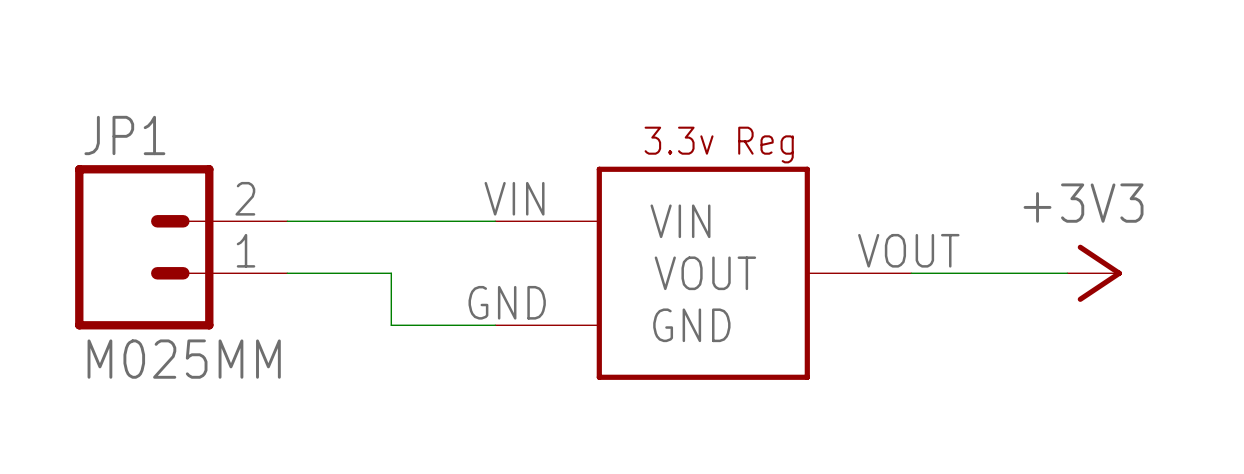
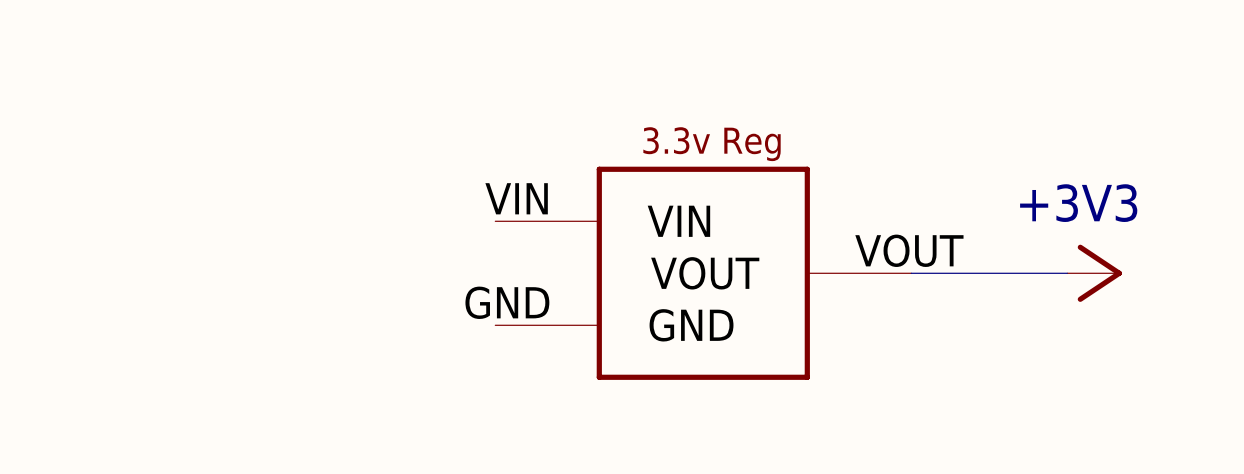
wire: (287, 221) (495, 221) -> none
JP1: M025MM (181, 247) -> none
wire: (287, 273) (391, 273) (391, 325) (495, 325) -> none

